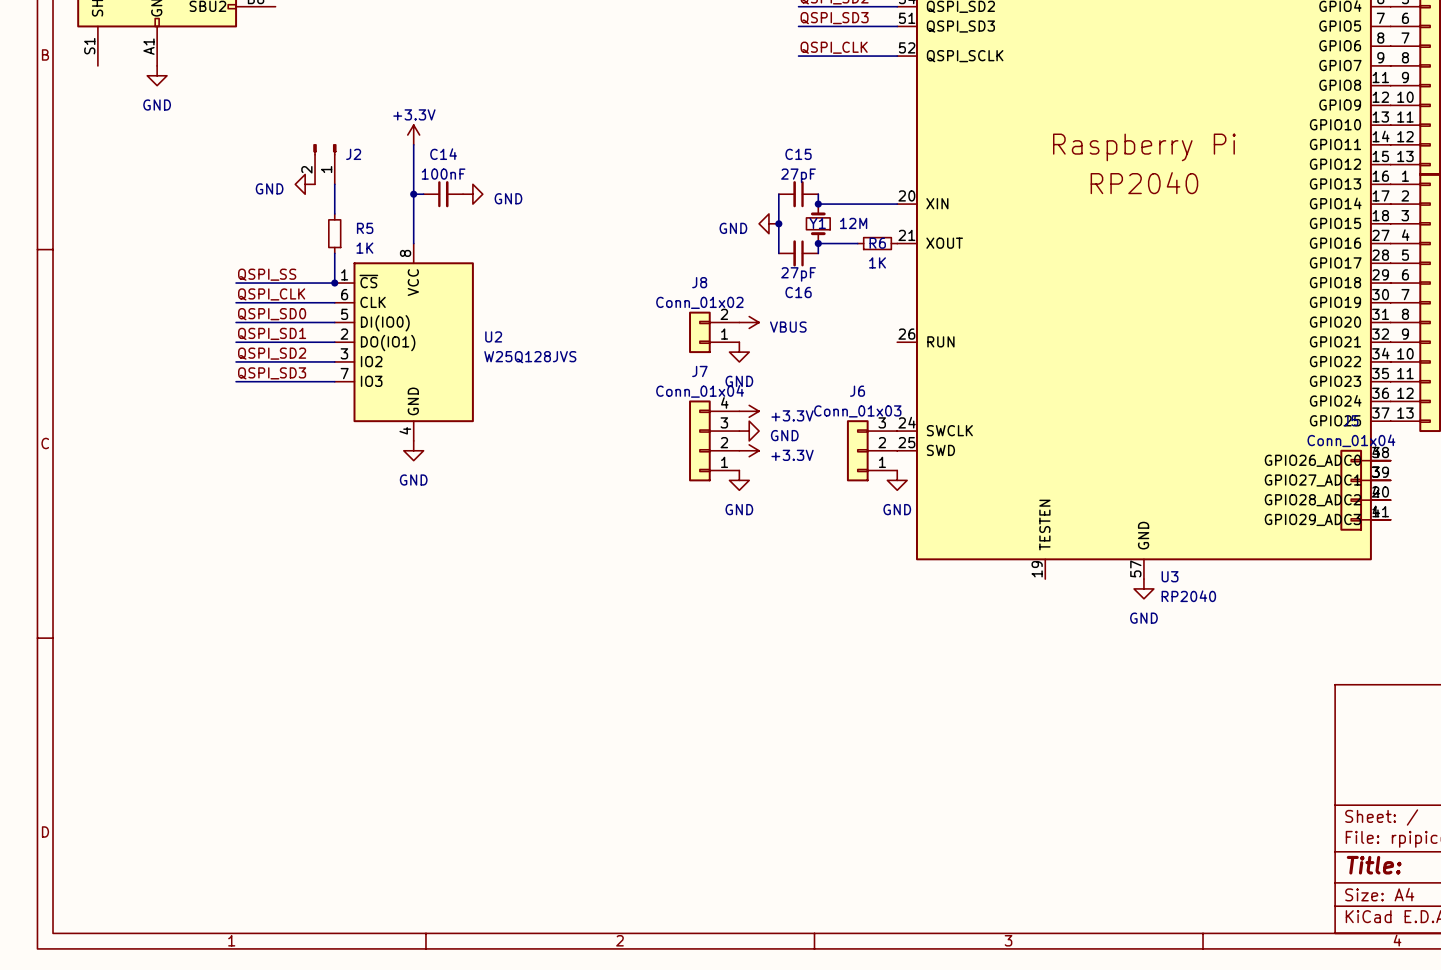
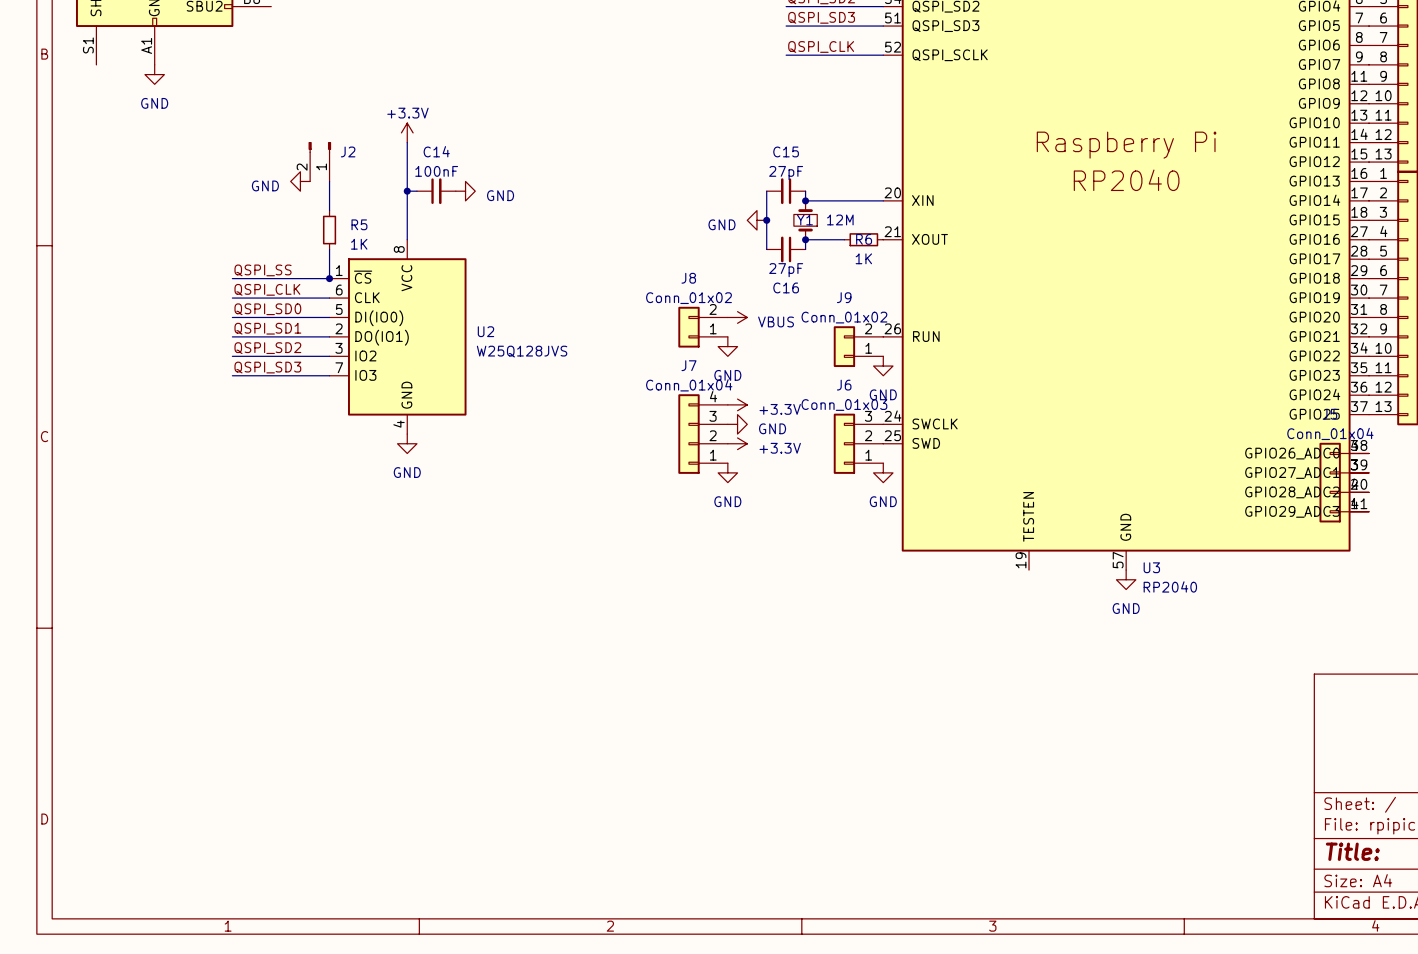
J9: none -> Conn_01x02 (858, 346)
power symbol: none -> GND (883, 366)

